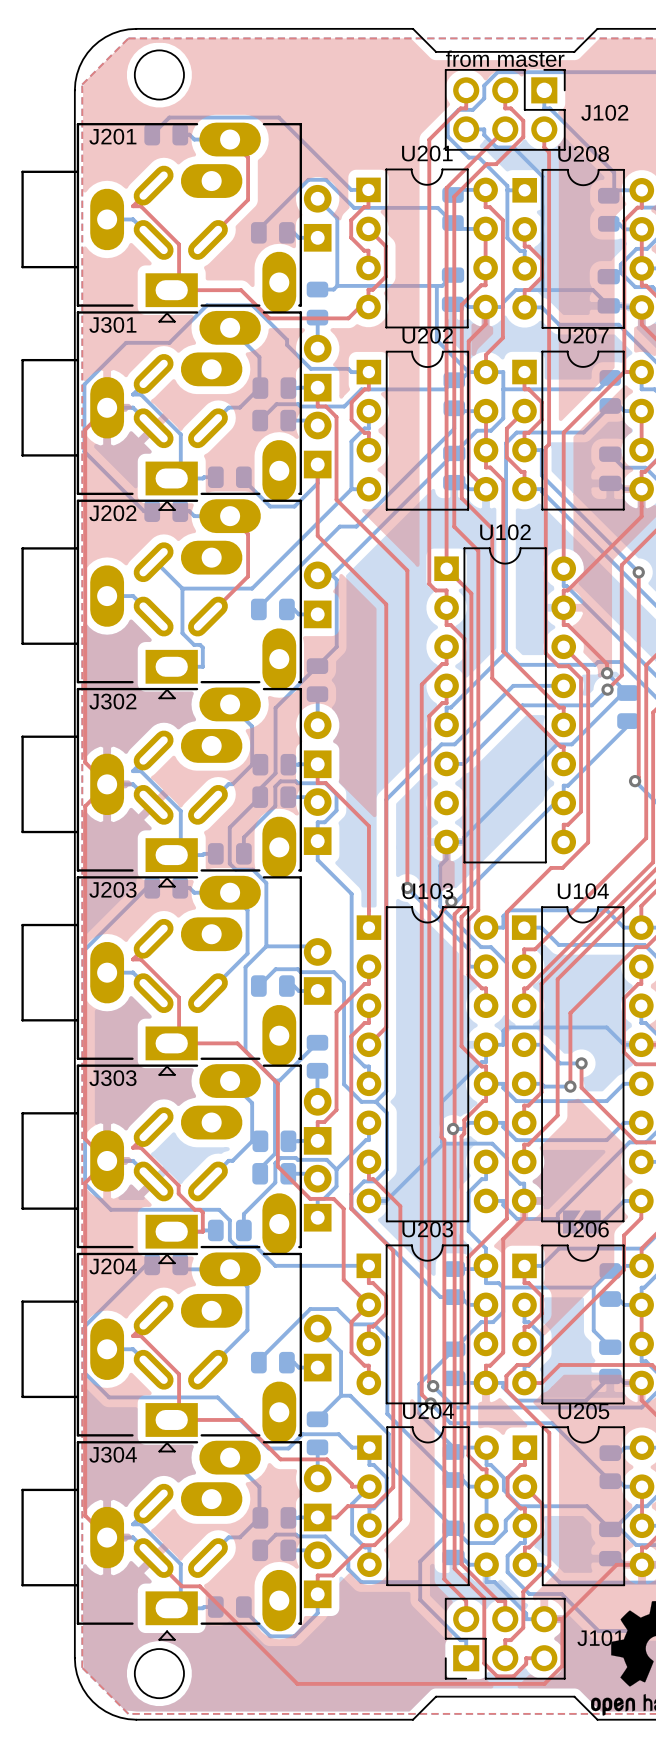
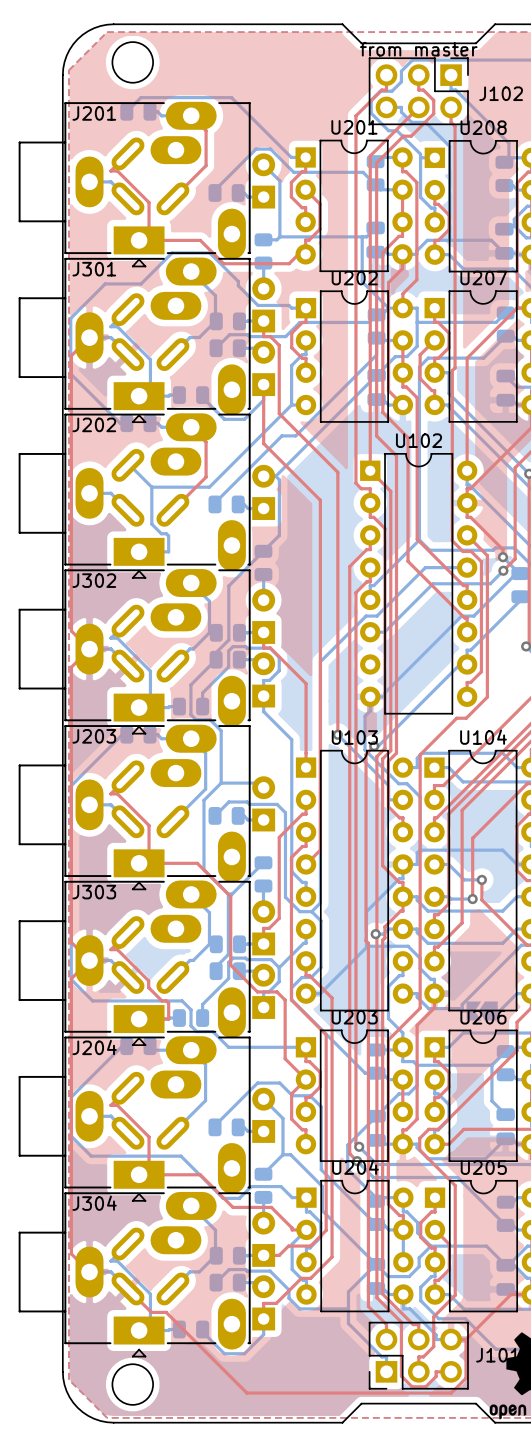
J201 footprint: [21, 122, 302, 323] -> [18, 101, 251, 268]
J301 footprint: [21, 310, 302, 511] -> [18, 257, 251, 423]
J202 footprint: [21, 499, 302, 700] -> [18, 413, 251, 579]
J302 footprint: [21, 687, 302, 888] -> [18, 569, 251, 735]
J203 footprint: [21, 875, 302, 1076] -> [18, 724, 251, 891]
J303 footprint: [21, 1064, 302, 1265] -> [18, 880, 251, 1046]
J204 footprint: [21, 1252, 302, 1453] -> [18, 1036, 251, 1202]
J304 footprint: [21, 1440, 302, 1641] -> [18, 1191, 251, 1358]

